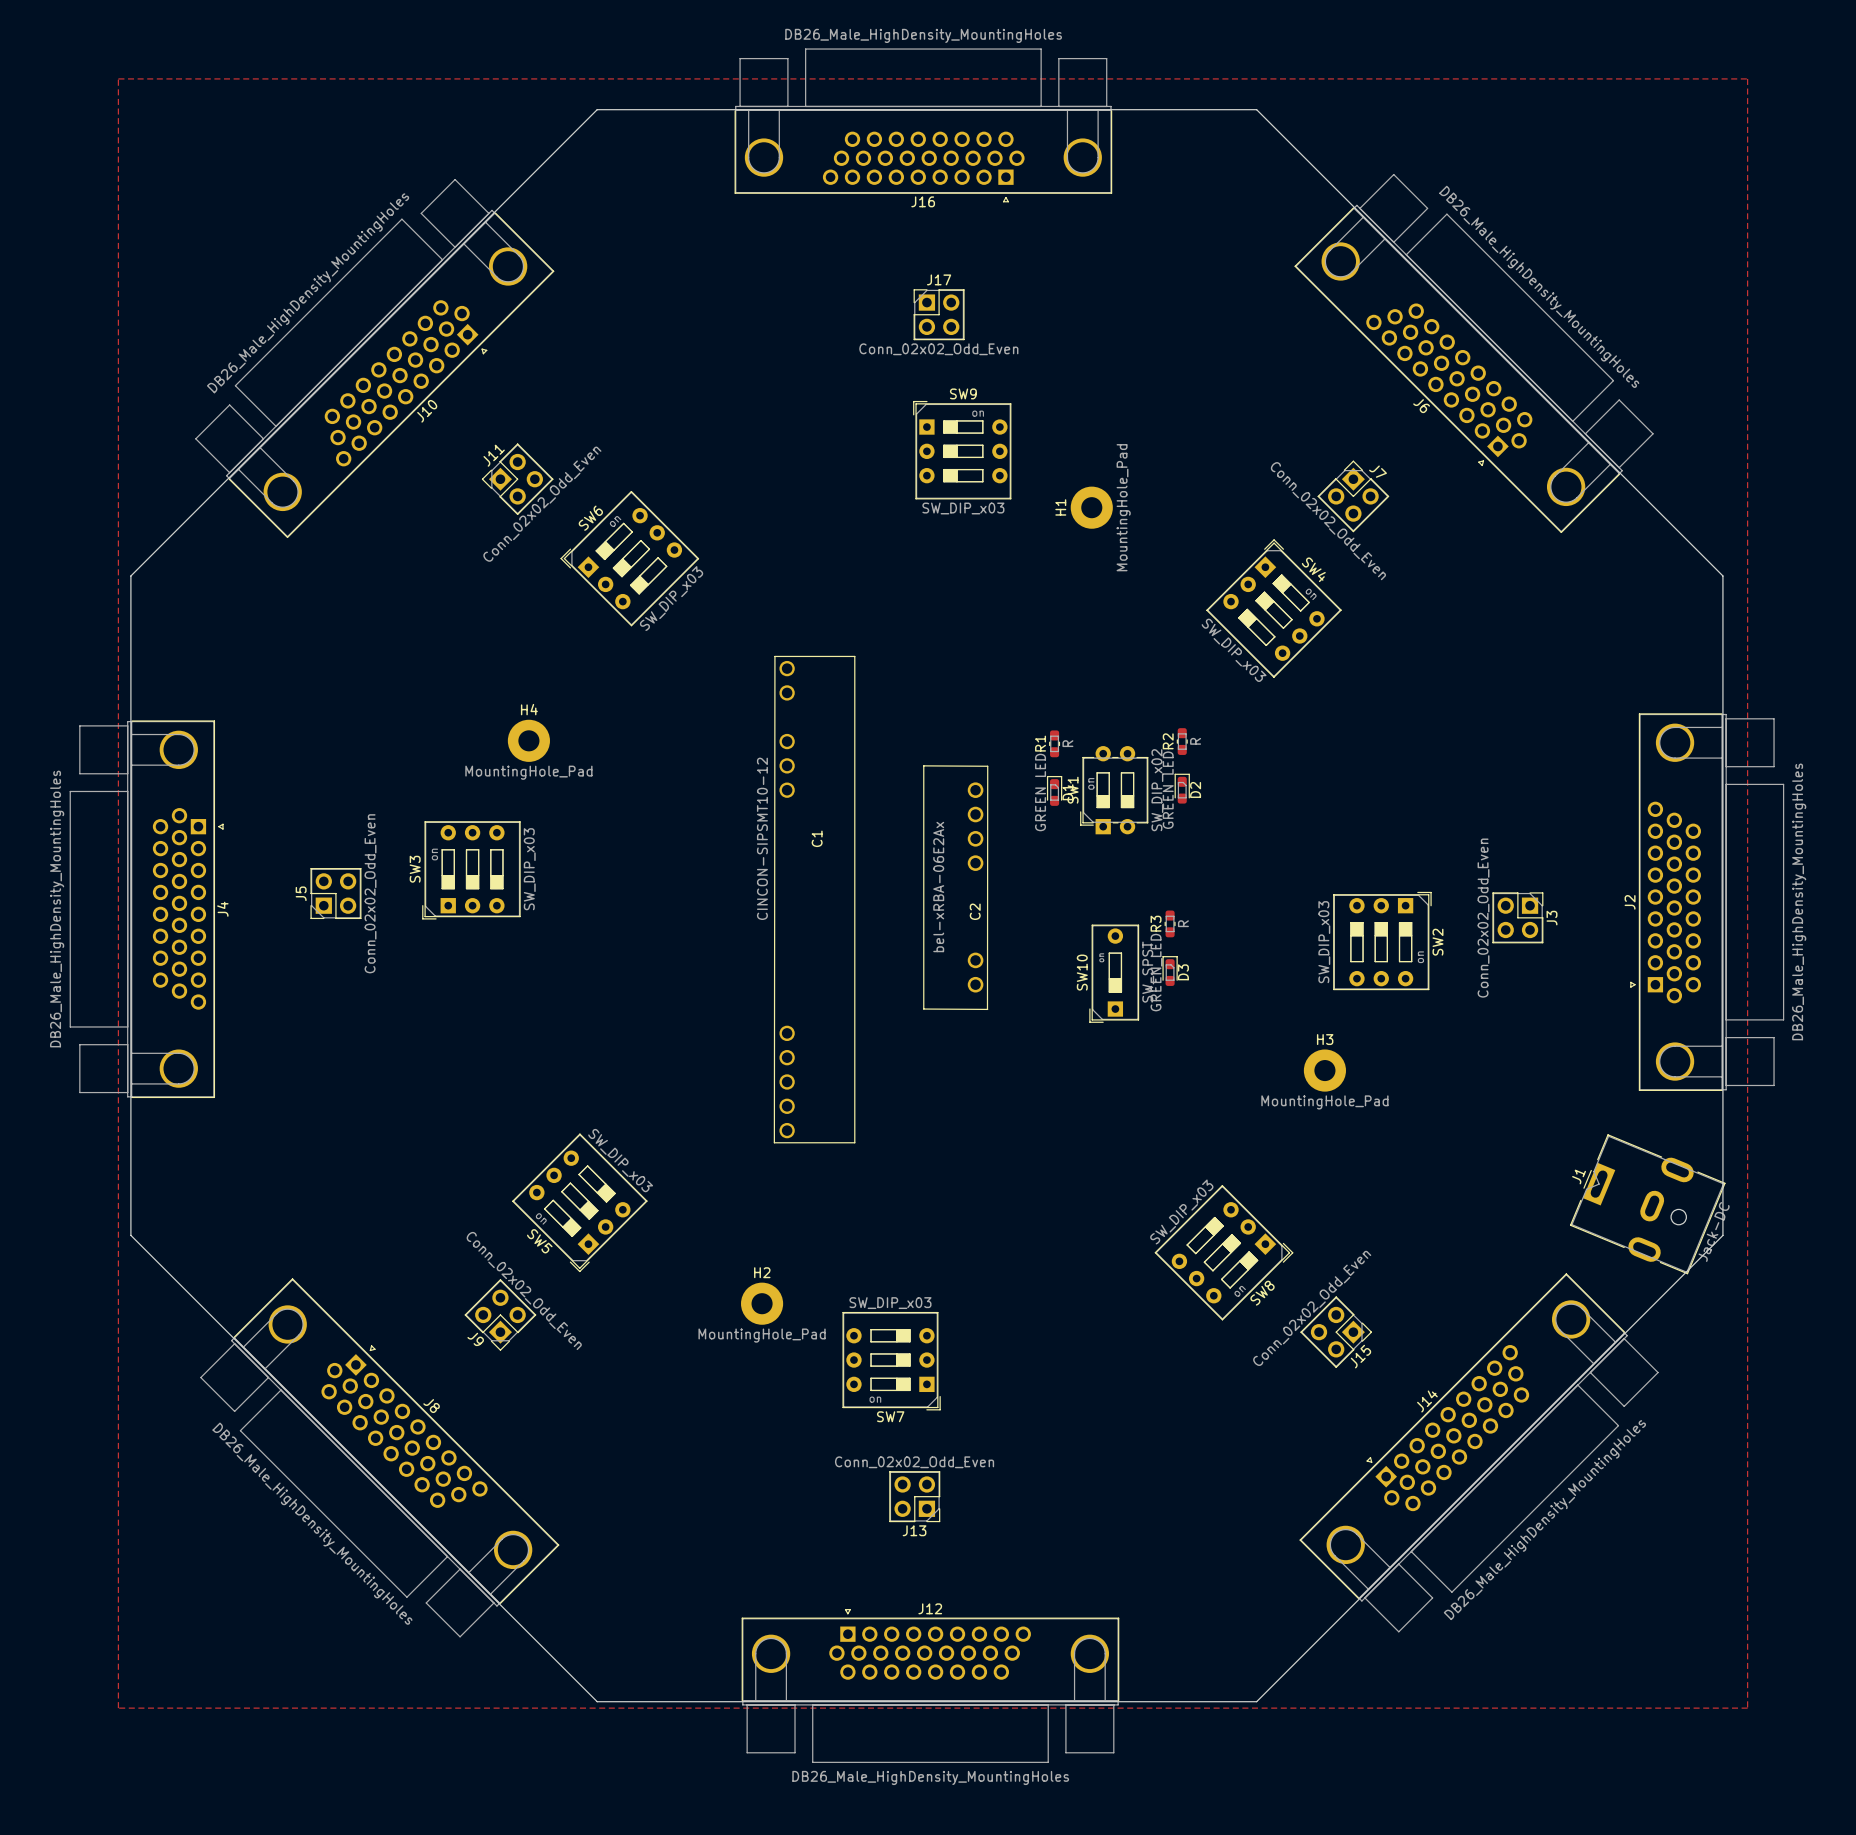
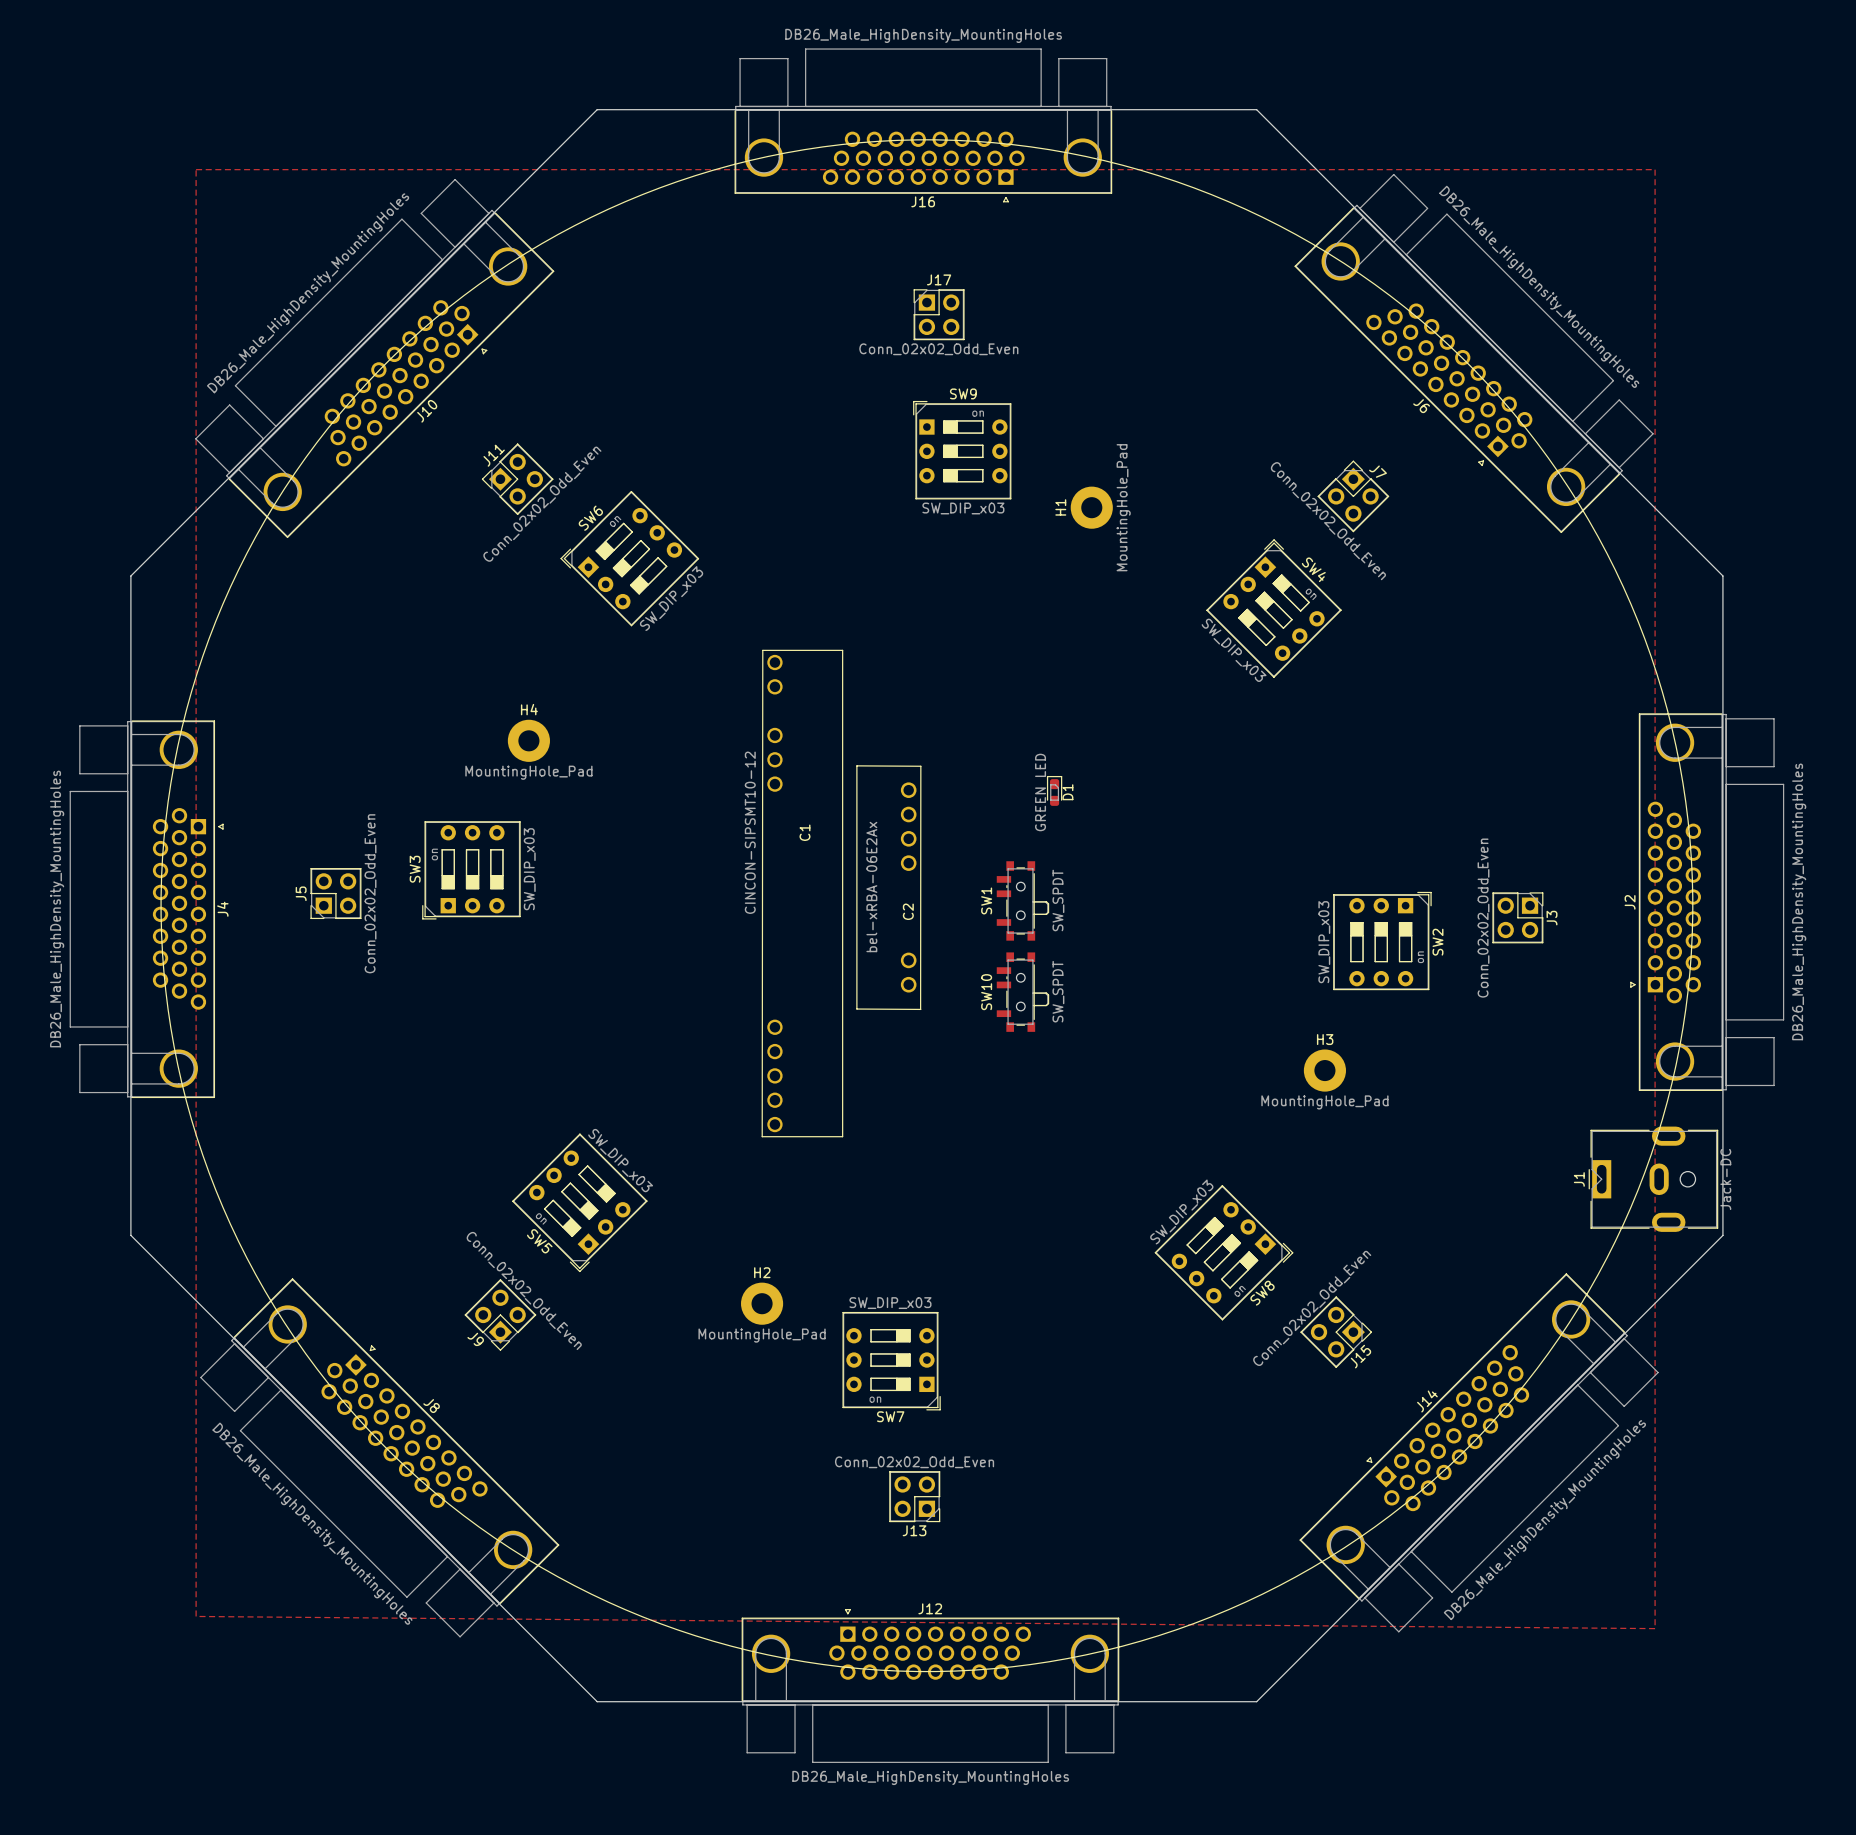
zone outline: (118, 78) (118, 1708) (1747, 1708) (1747, 78) (118, 78) -> (196, 169) (196, 1616) (1655, 1628) (1655, 169) (196, 169)
drawing: none -> [160, 139, 1694, 1673]
R2: R (1182, 741) -> none
R1: R (1054, 743) -> none
SW1 footprint: [1080, 746, 1149, 835] -> [996, 861, 1050, 941]
D2: GREEN LED (1182, 788) -> none
SW1 value: SW_DIP_x02 (1157, 790) -> SW_SPDT (1058, 900)
C2 position: (955, 887) -> (888, 887)
C1 position: (814, 899) -> (802, 893)
R3: R (1170, 923) -> none
SW10 footprint: [1089, 924, 1140, 1023] -> [996, 952, 1050, 1032]
D3: GREEN_LED (1170, 971) -> none
SW10 value: SW_SPST (1148, 972) -> SW_SPDT (1058, 991)
J1 rotation: 0° (1647, 1204) -> 22.5° counterclockwise (1653, 1179)

